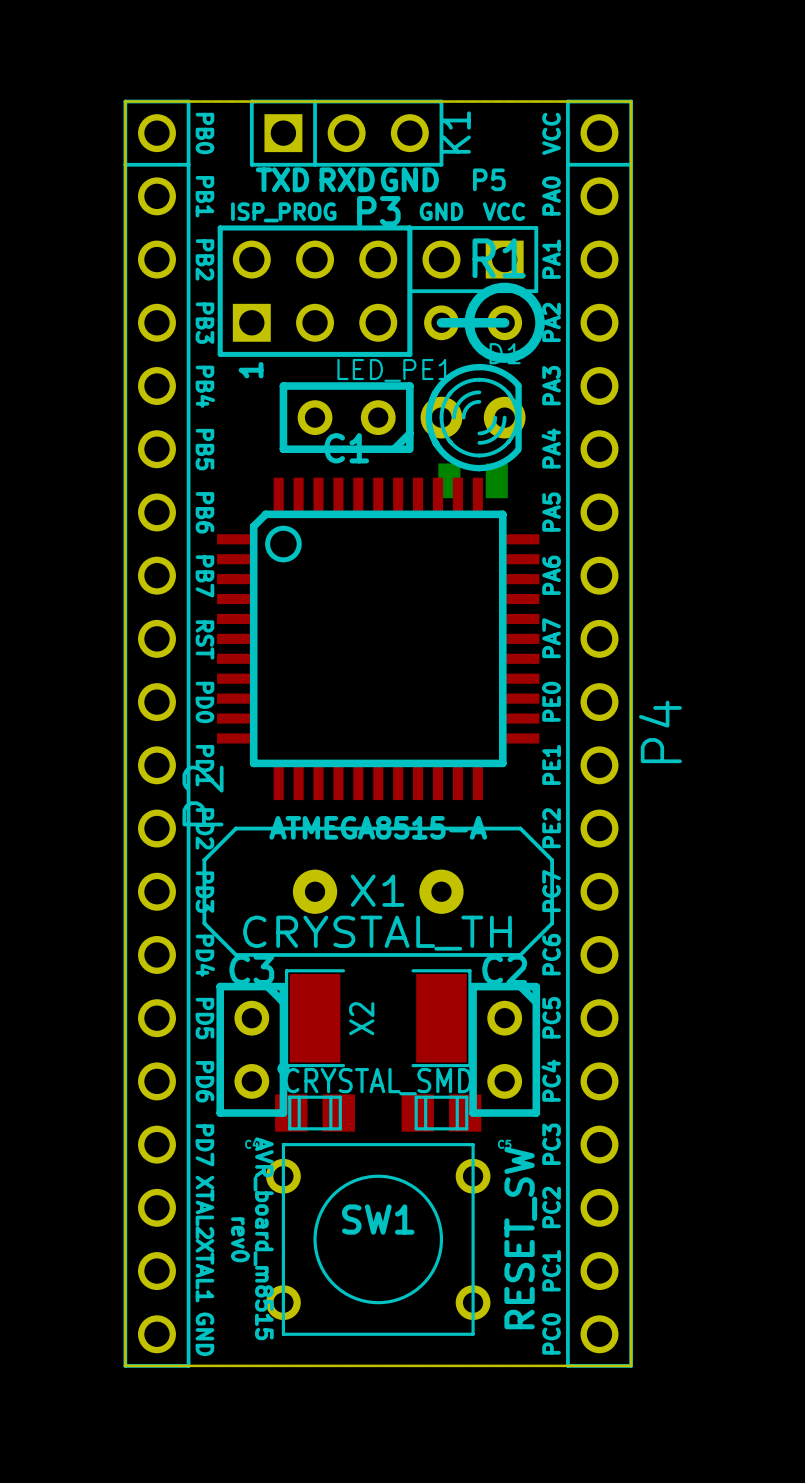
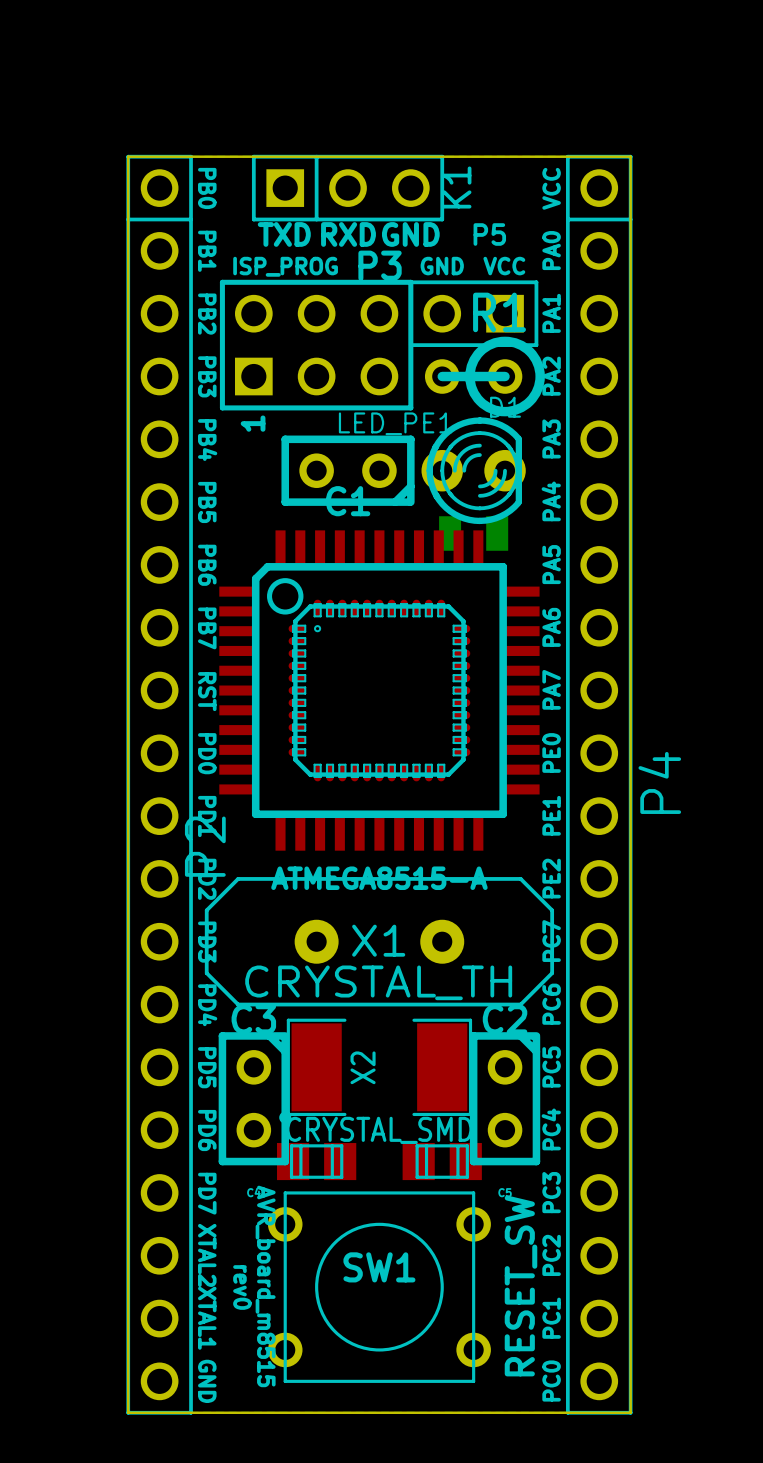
part: none -> (379, 690)

